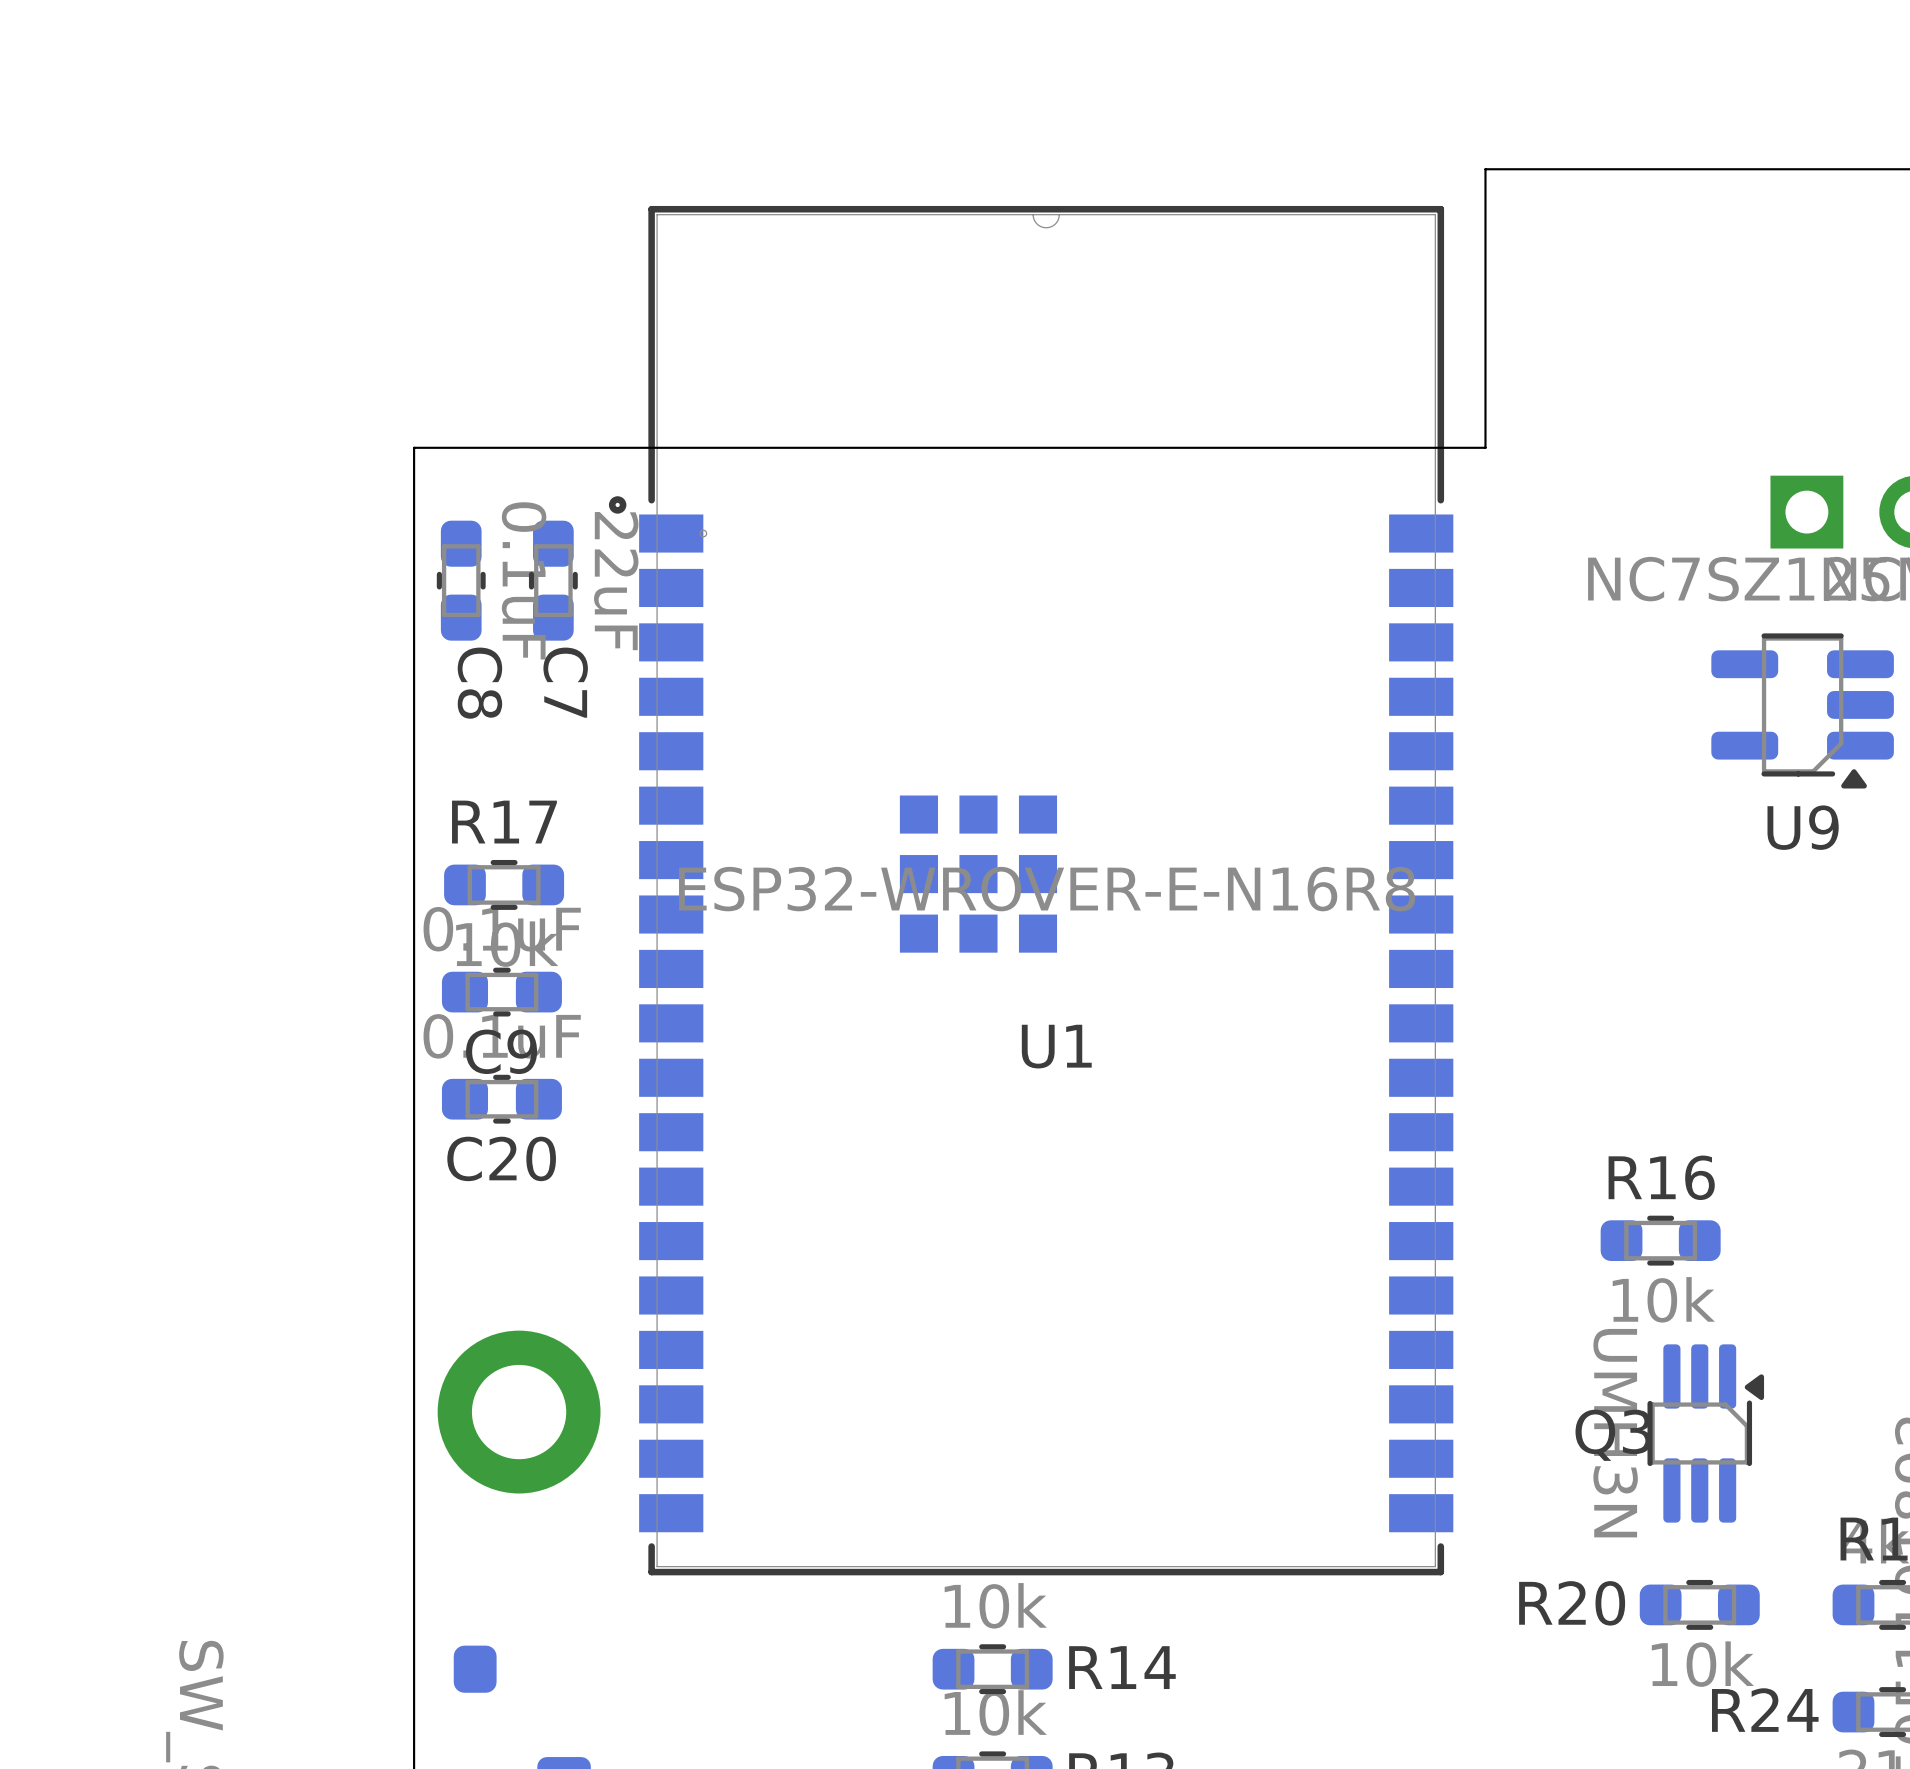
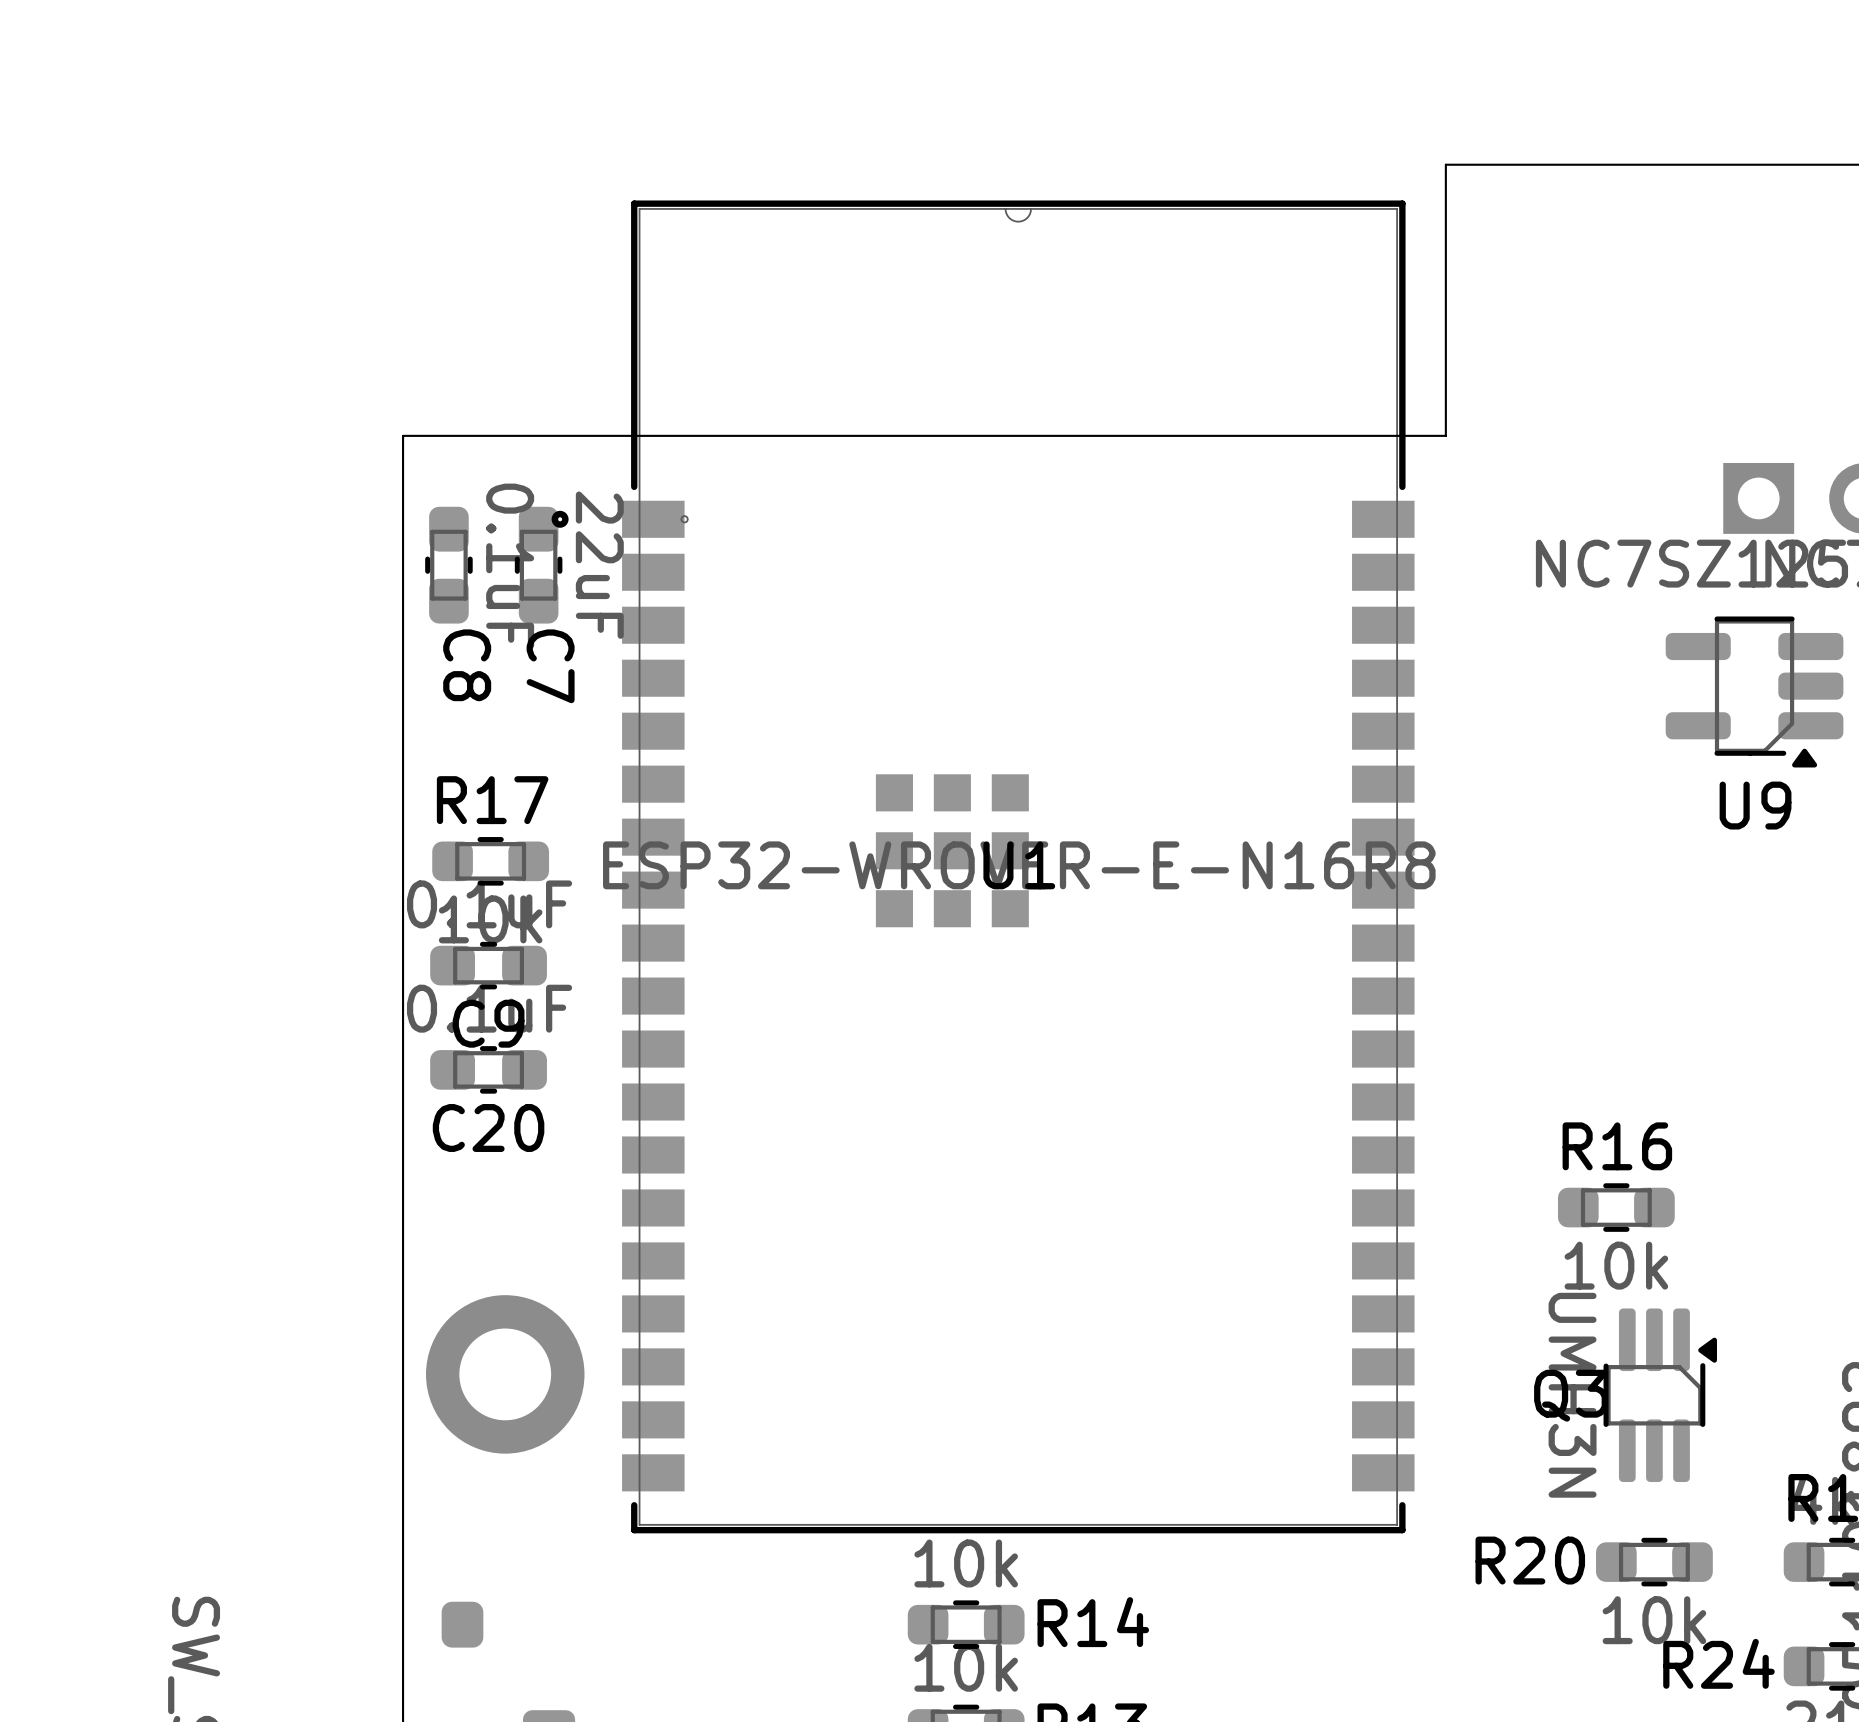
U1 footprint: [608, 205, 1454, 1576] -> [551, 200, 1415, 1534]
U1 name position: U1 (1056, 1046) -> U1 (1019, 865)

